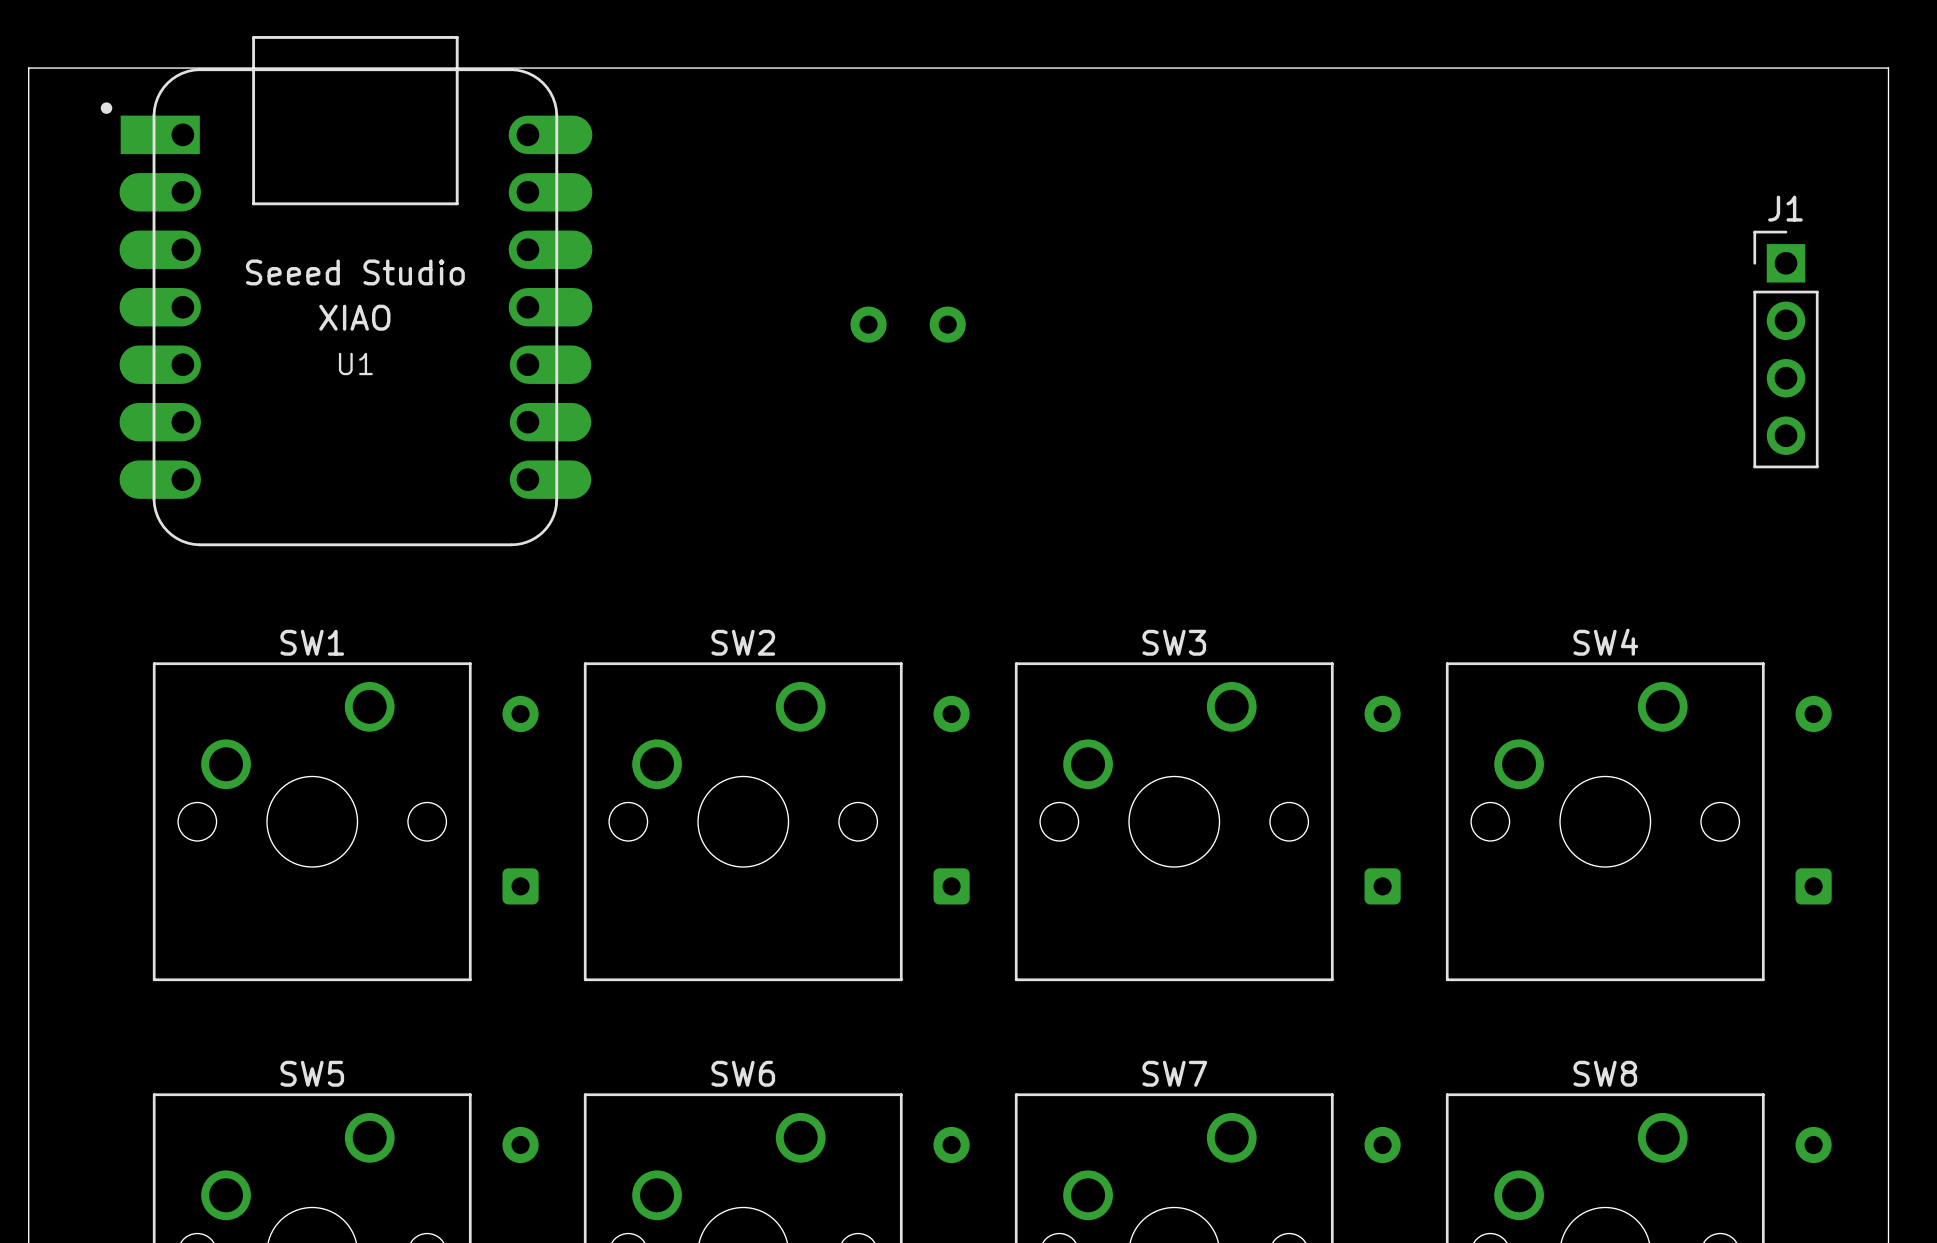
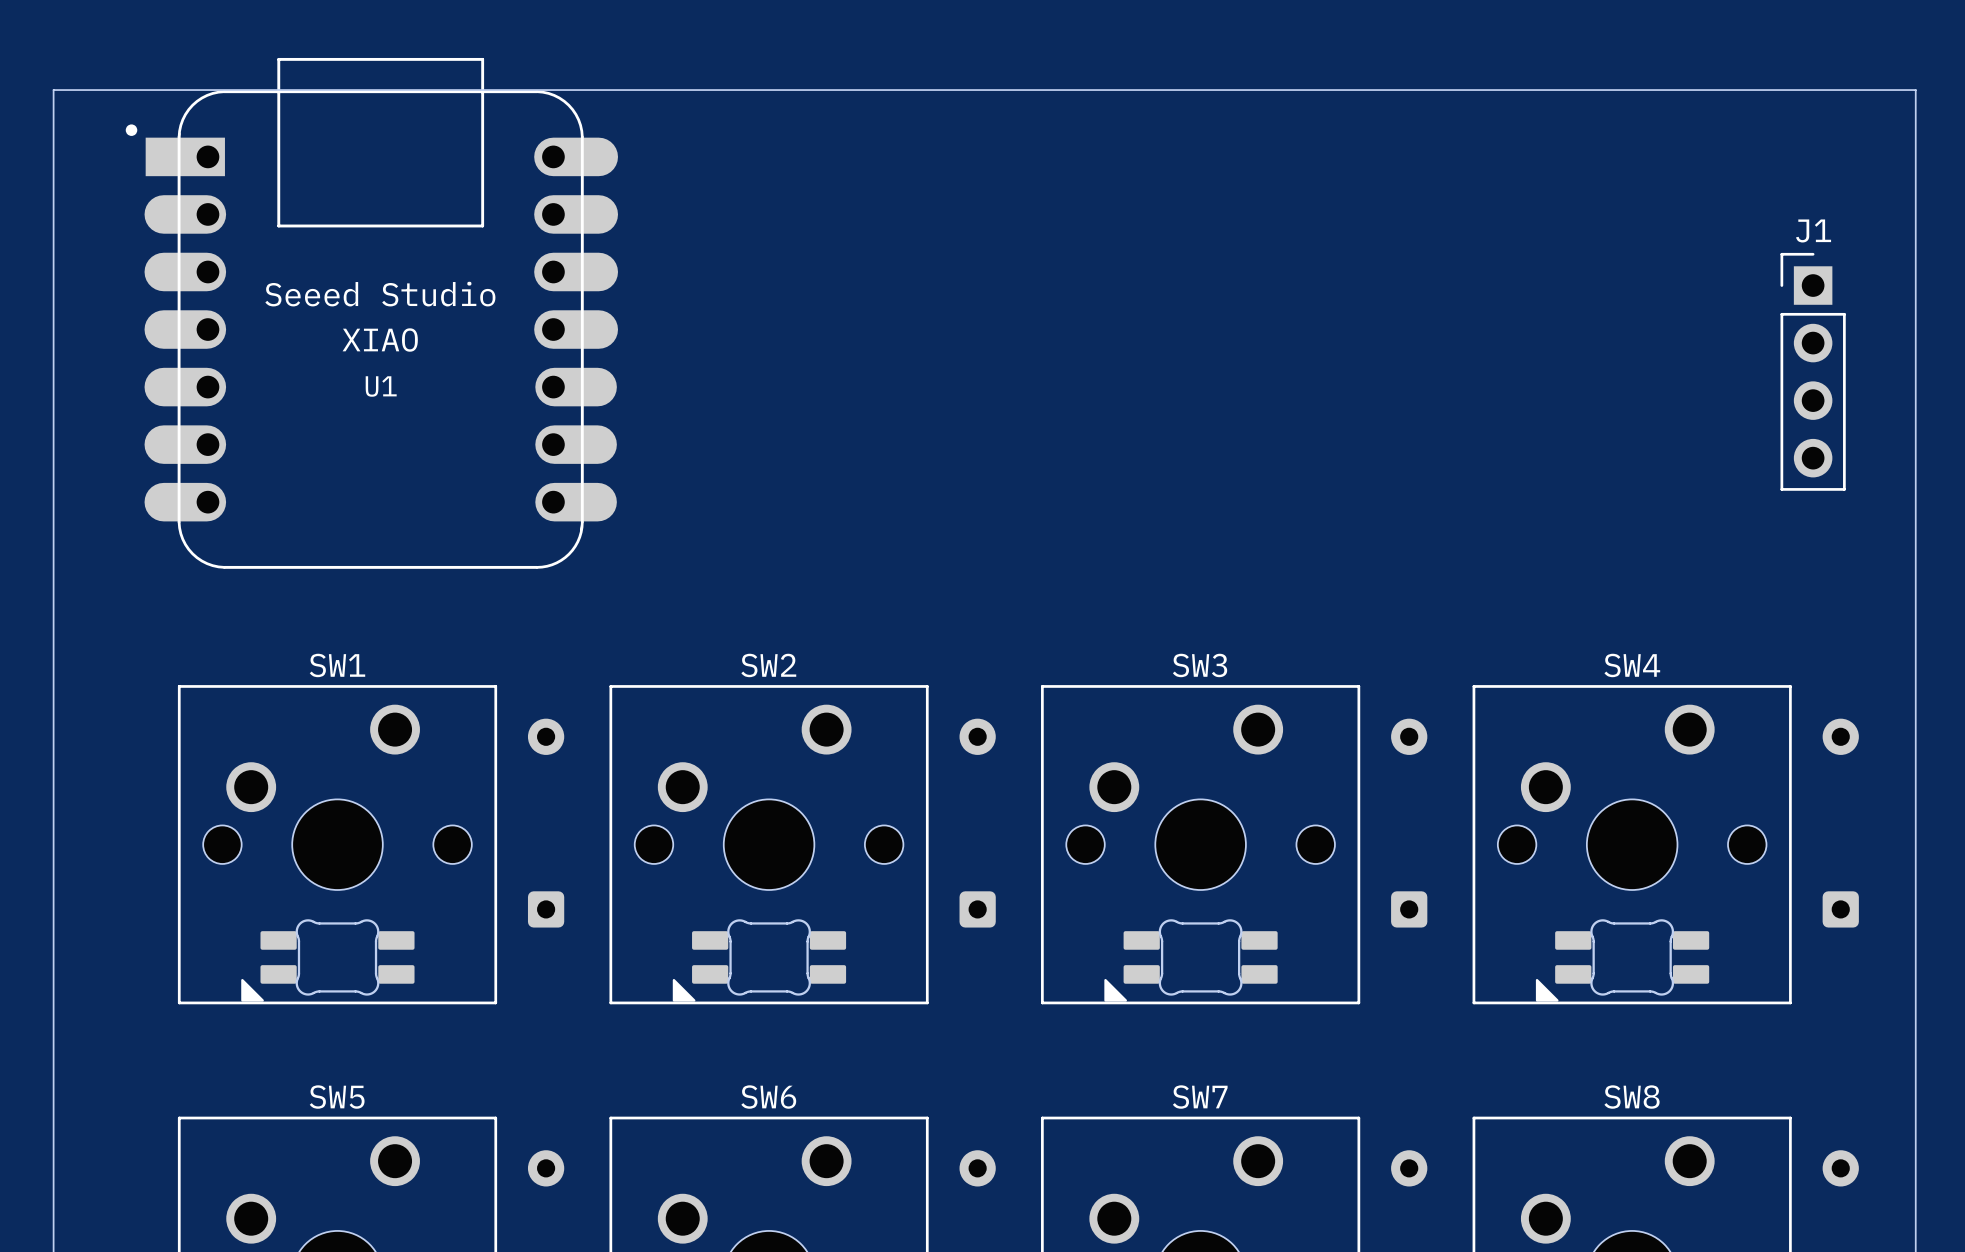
part: (908, 324) -> none
part: none -> (327, 960)
part: none -> (759, 960)
part: none -> (1190, 960)
part: none -> (1622, 960)

